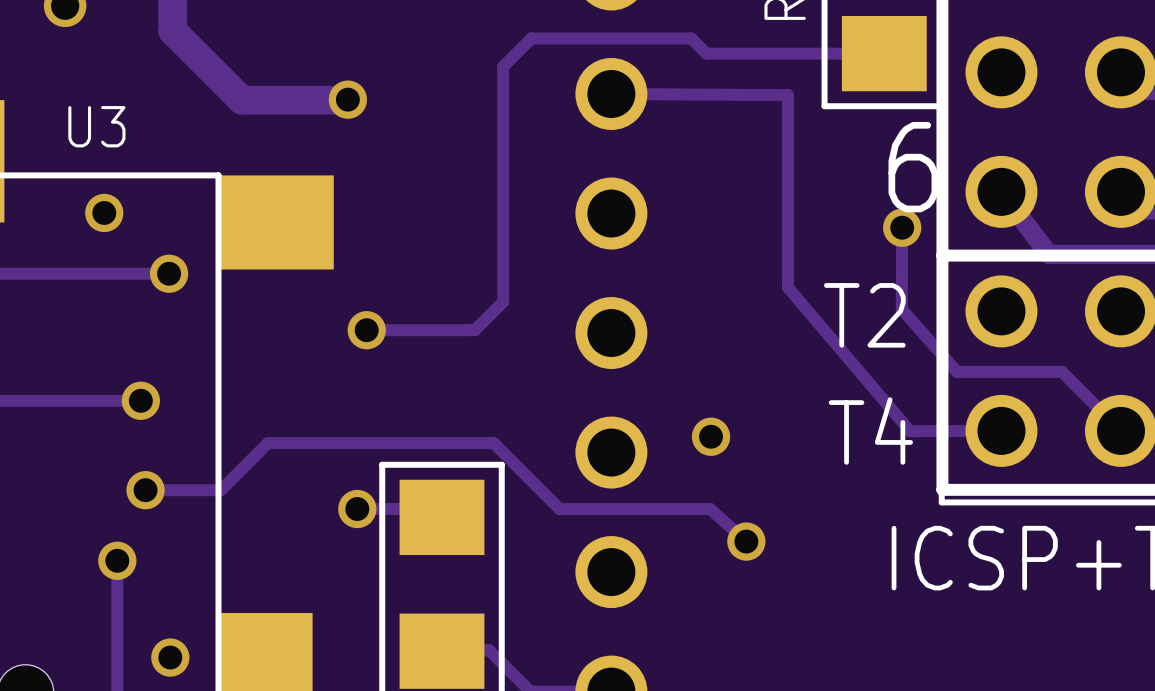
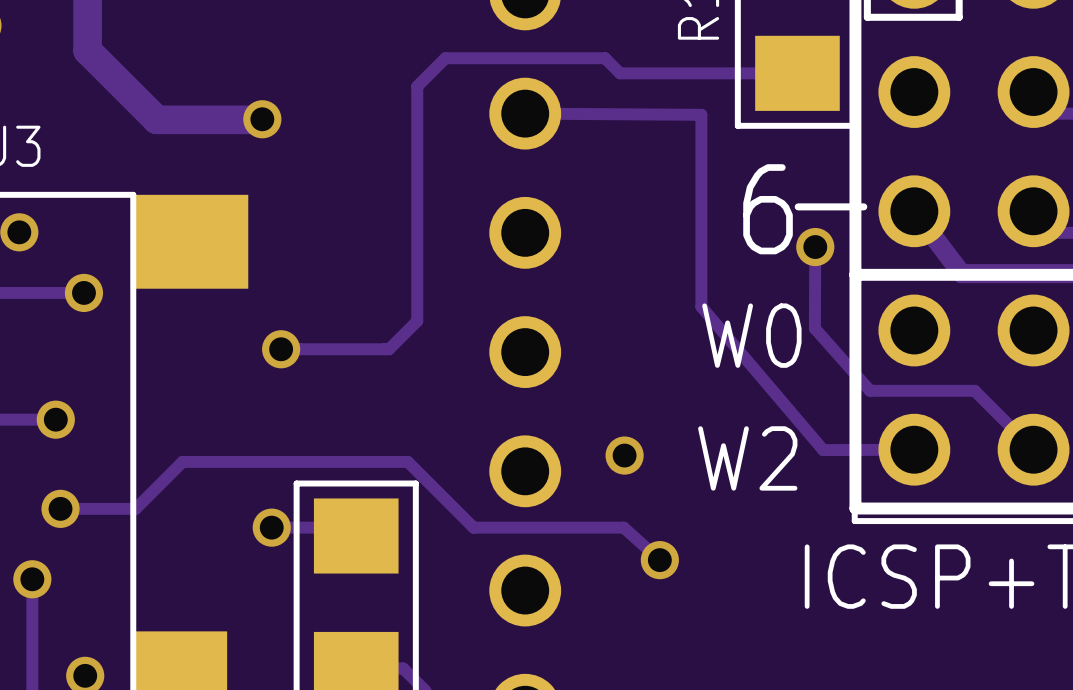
text position: 6 (913, 167) -> 6 (768, 209)
line: none -> (863, 206) (798, 206)
text: T2 (864, 315) -> none
text: none -> W0 (751, 335)
text: T4 (870, 431) -> none
text: none -> W2 (747, 458)

